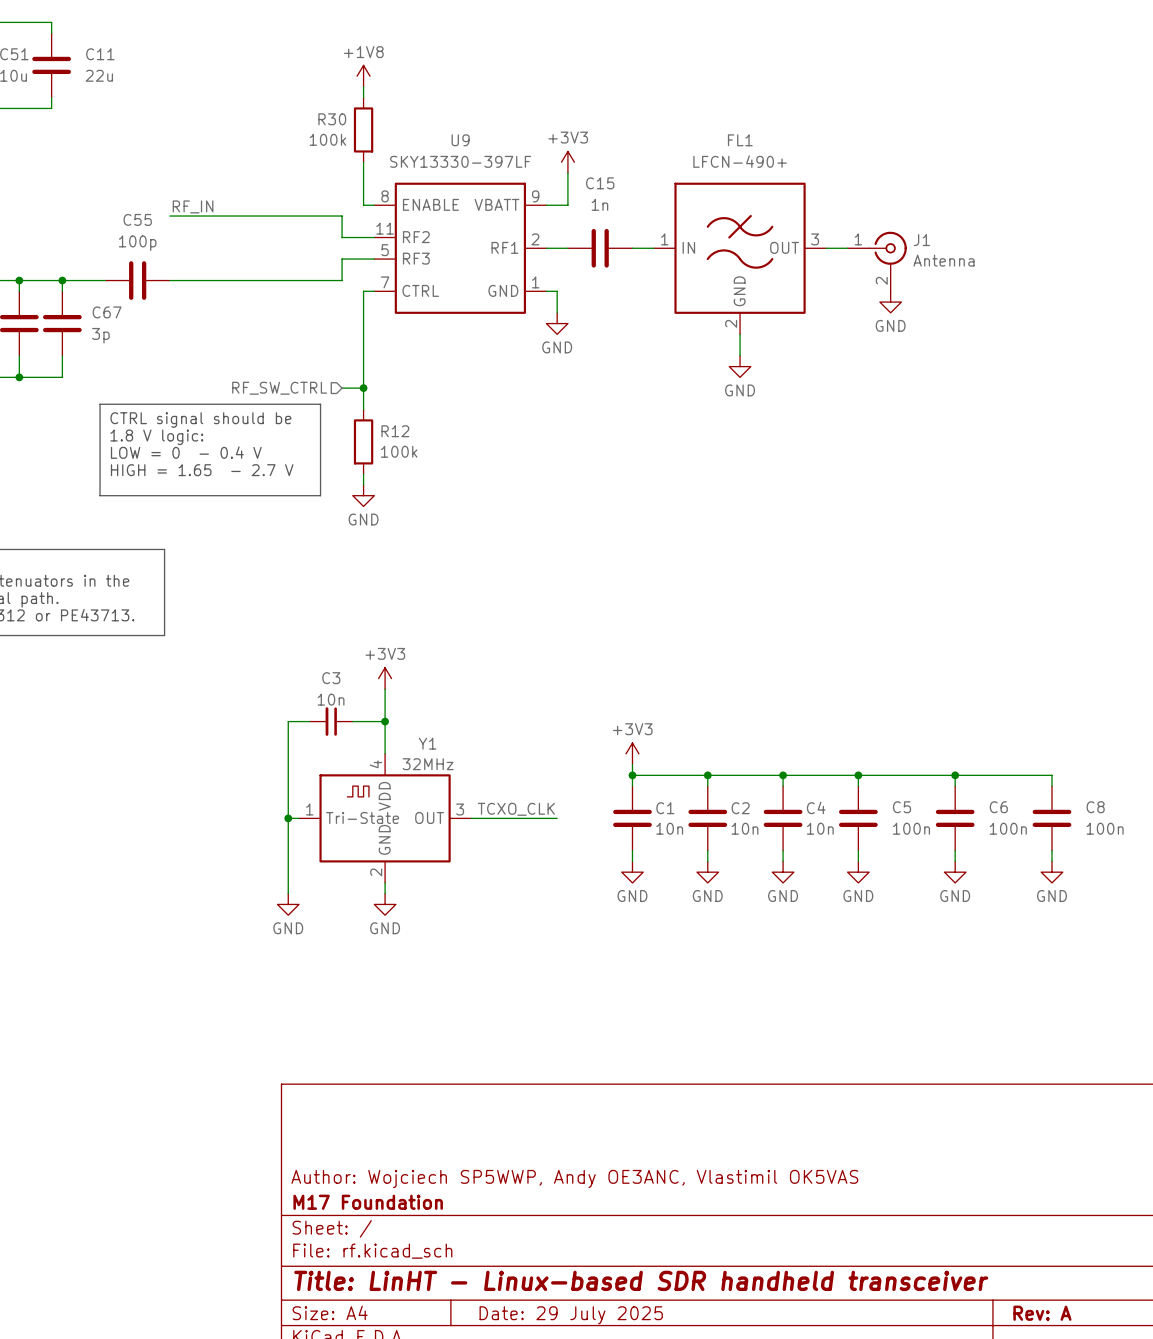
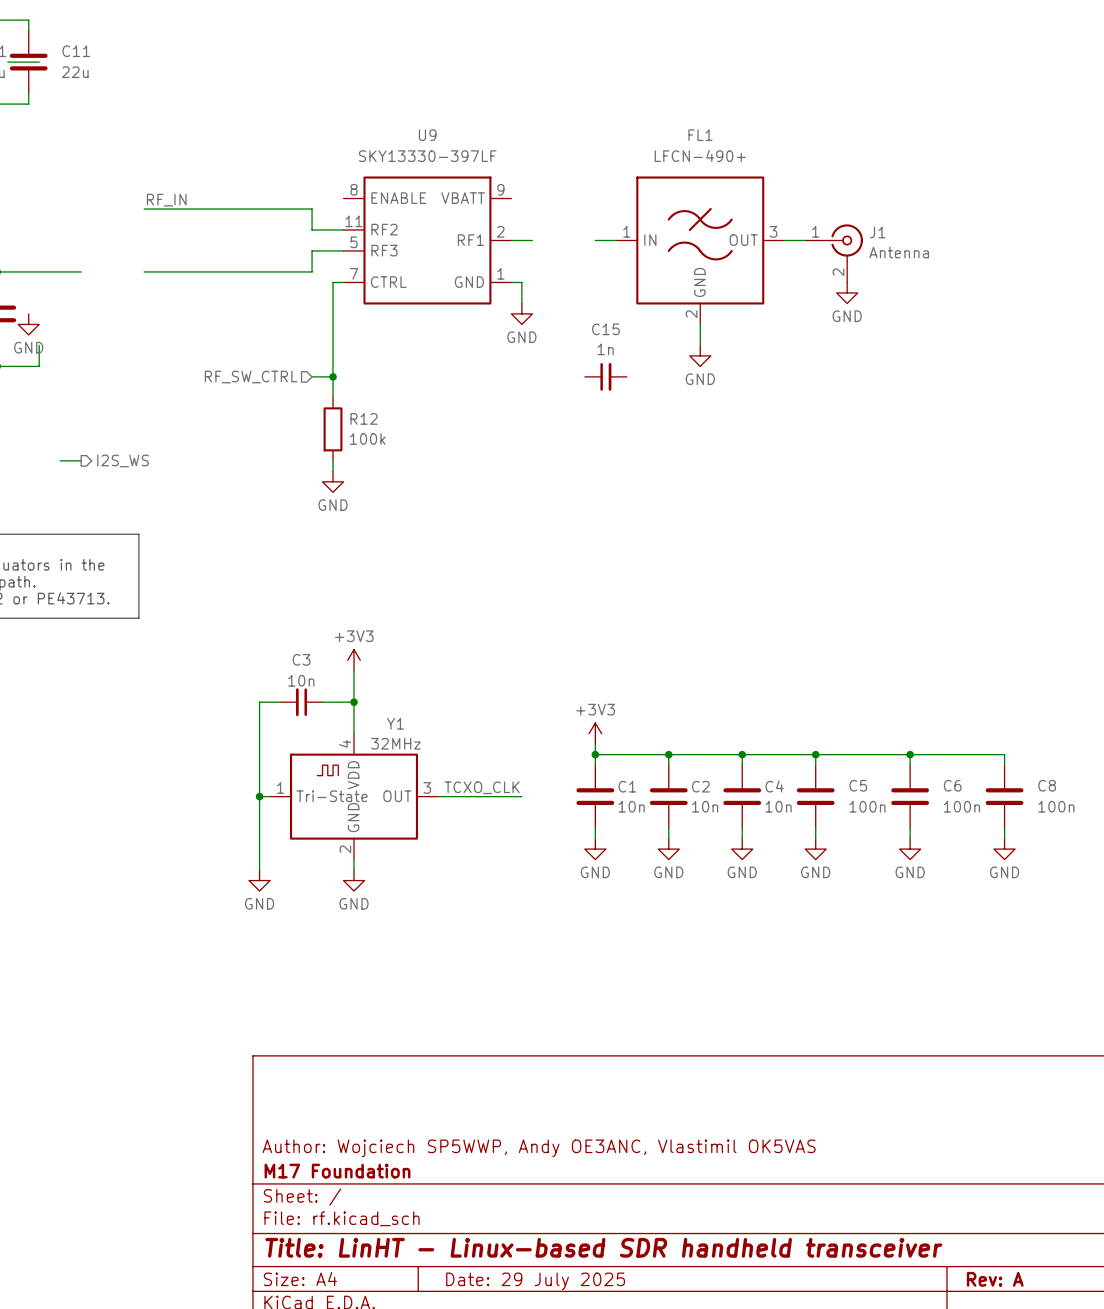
wire: none -> (7, 62) (39, 62)
power symbol: +1V8 (363, 76) -> none
wire: (363, 86) (363, 97) -> none
R30: 100k (363, 129) -> none
wire: (363, 162) (363, 205) (374, 205) -> none
power symbol: +3V3 (567, 162) -> none
wire: (567, 172) (567, 205) (546, 205) -> none
C15 symbol: [567, 228, 633, 268] -> [584, 362, 627, 391]
wire: (62, 280) (62, 291) -> none
junction: (62, 280) -> none
C55: 100p (137, 280) -> none
C67: 3p (62, 323) -> none
power symbol: none -> GND (28, 324)
line: (100, 404) (320, 404) (320, 495) (100, 495) (100, 404) -> none
text: CTRL signal should be (200, 420) -> none
text: 1.8 V logic: (156, 437) -> none
text: LOW = 0 - 0.4 V (186, 452) -> none
text: HIGH = 1.65 - 2.7 V (202, 470) -> none
wire: none -> (60, 460) (81, 460)
hierarchical label: none -> I2S_WS (123, 460)

